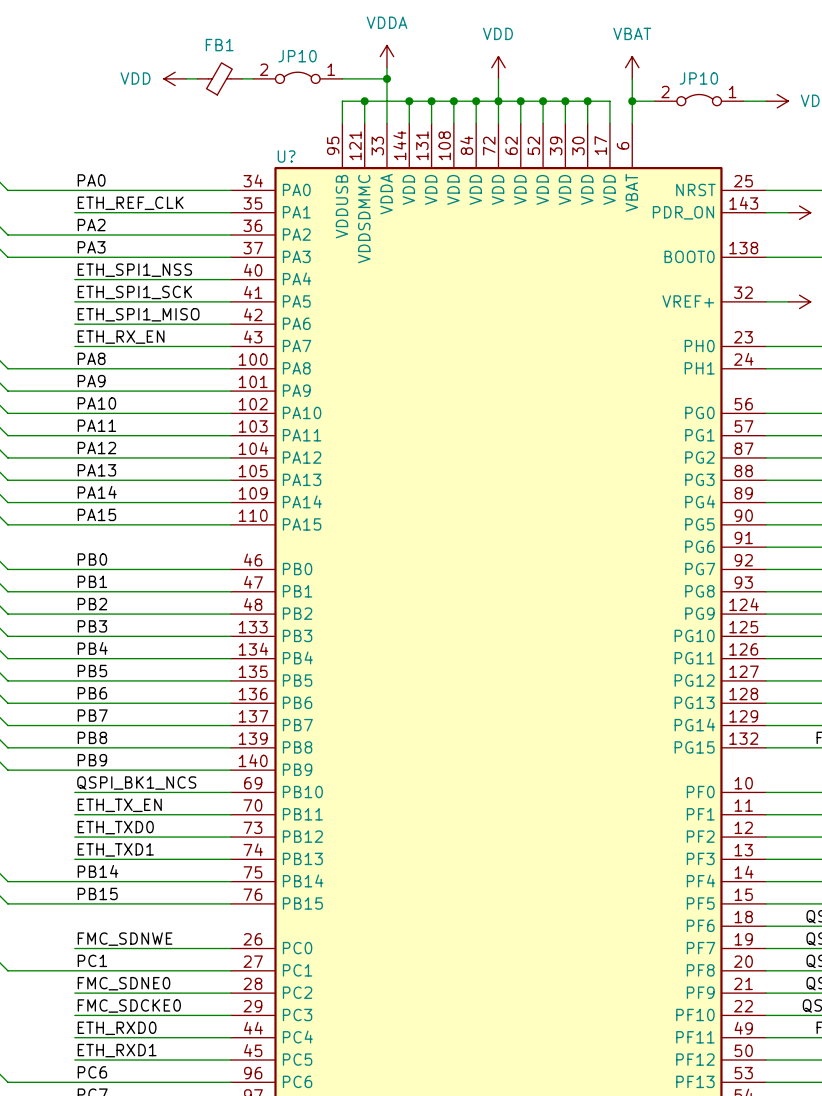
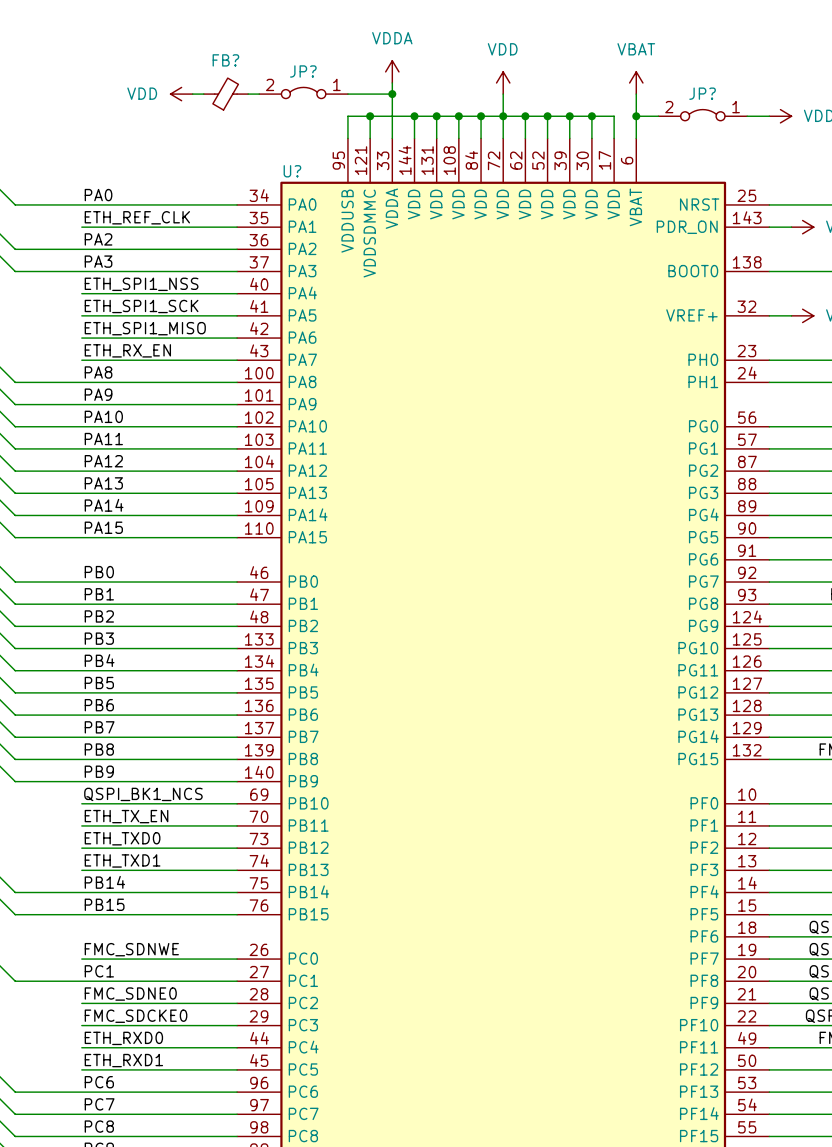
FB1 name: FB1 (219, 45) -> FB? (225, 60)
JP10 name: JP10 (297, 56) -> JP? (303, 71)
JP10 name: JP10 (698, 78) -> JP? (702, 93)

